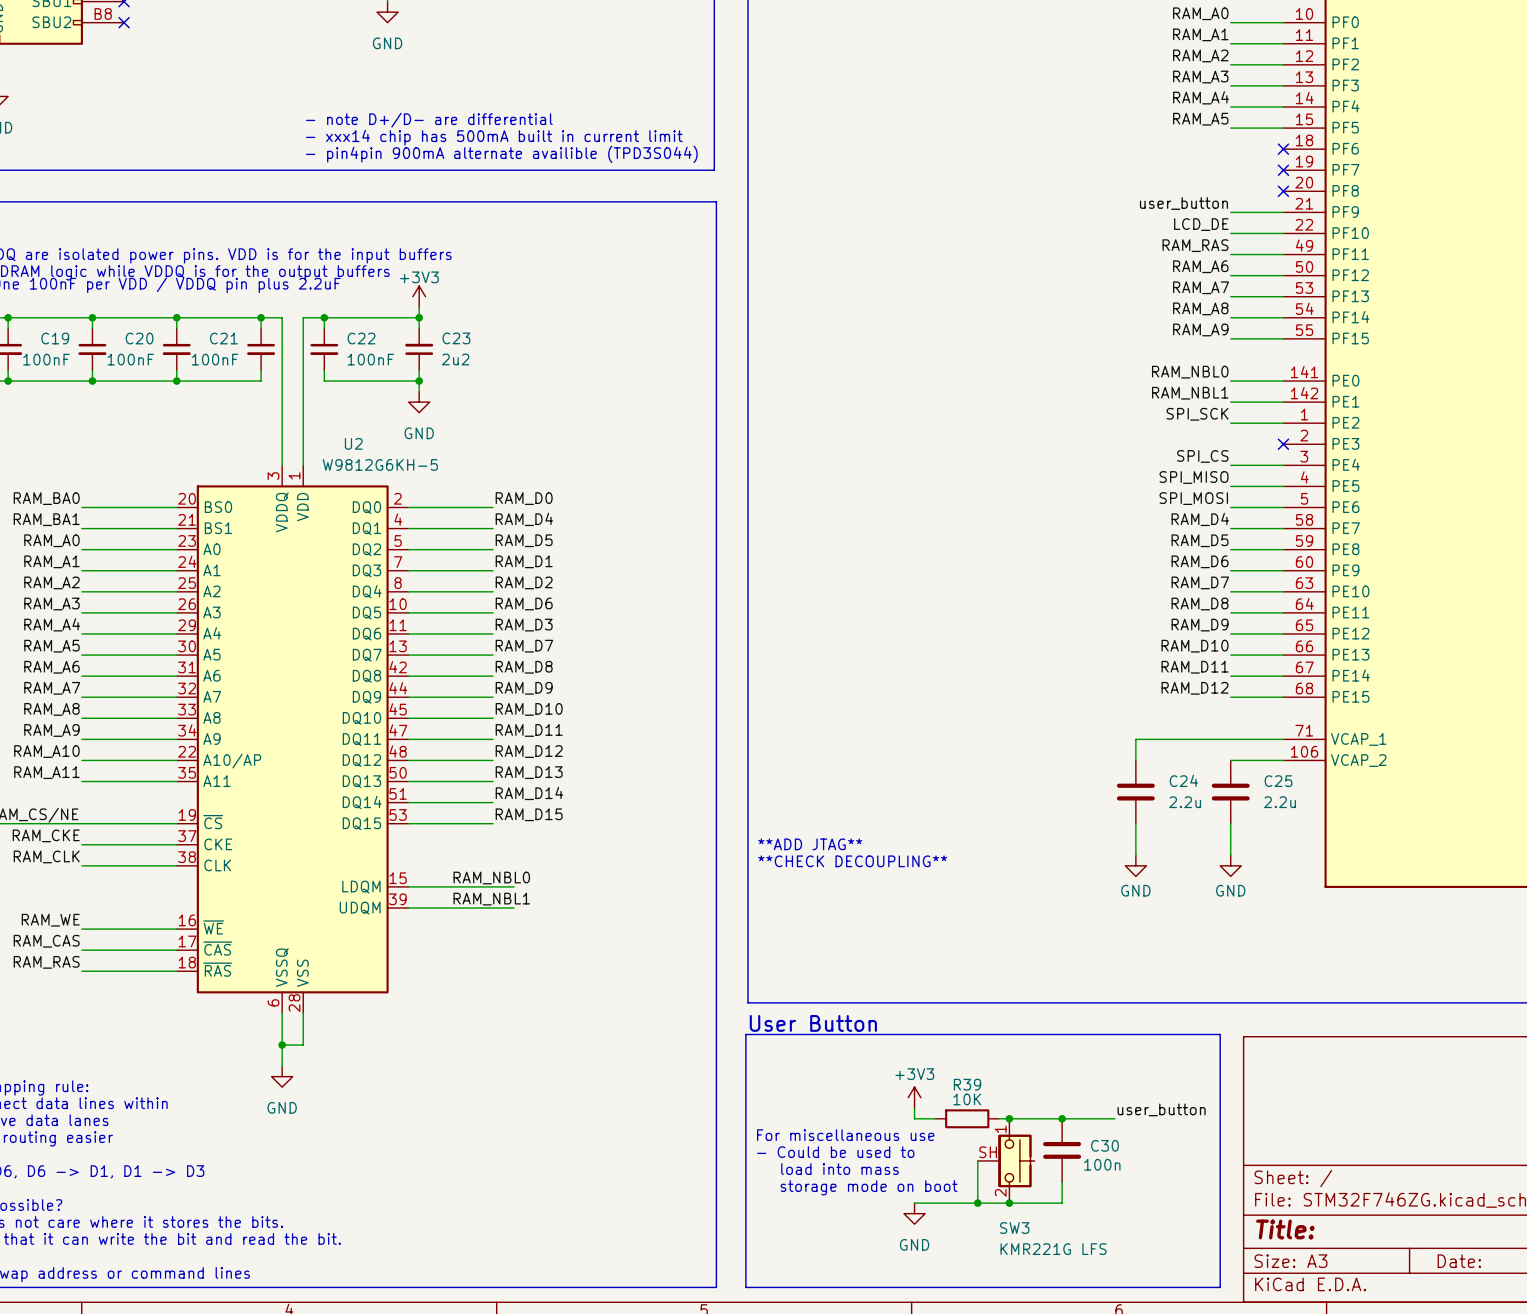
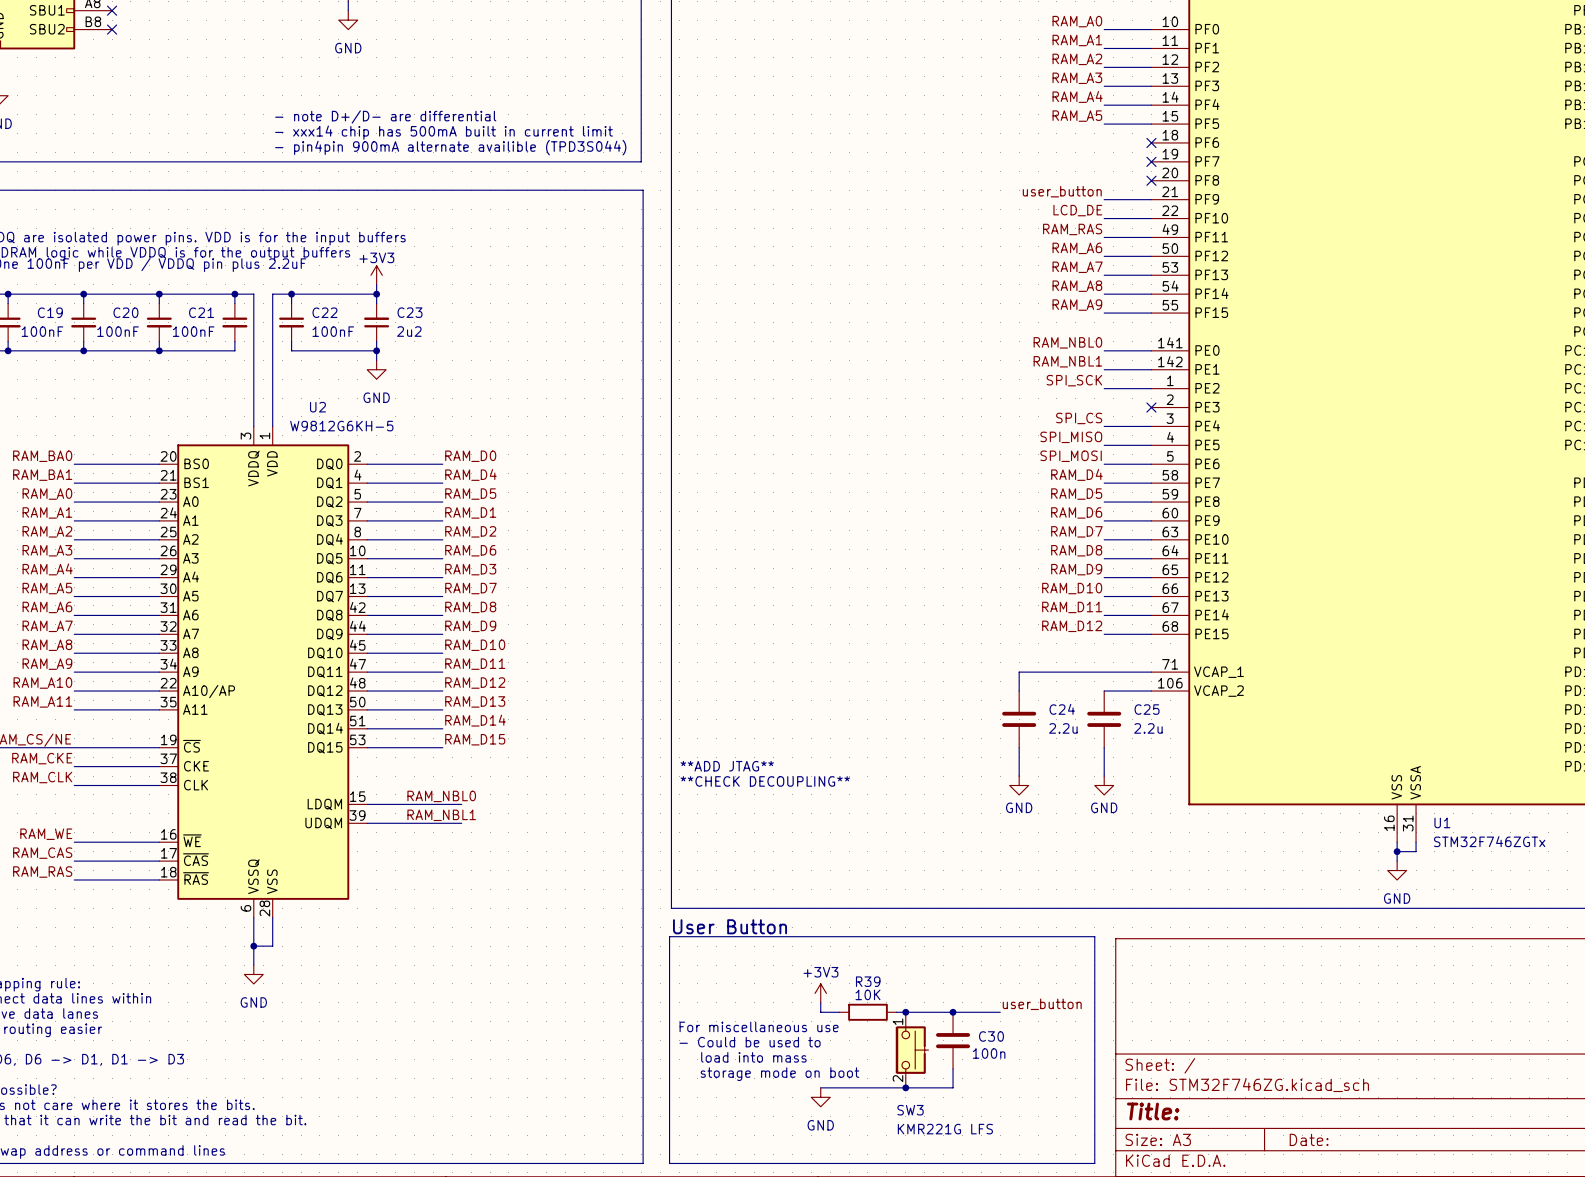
SW3 symbol: [977, 1118, 1035, 1204] -> [896, 1012, 929, 1088]
wire: (977, 1160) (977, 1203) -> none
junction: (977, 1203) -> none

